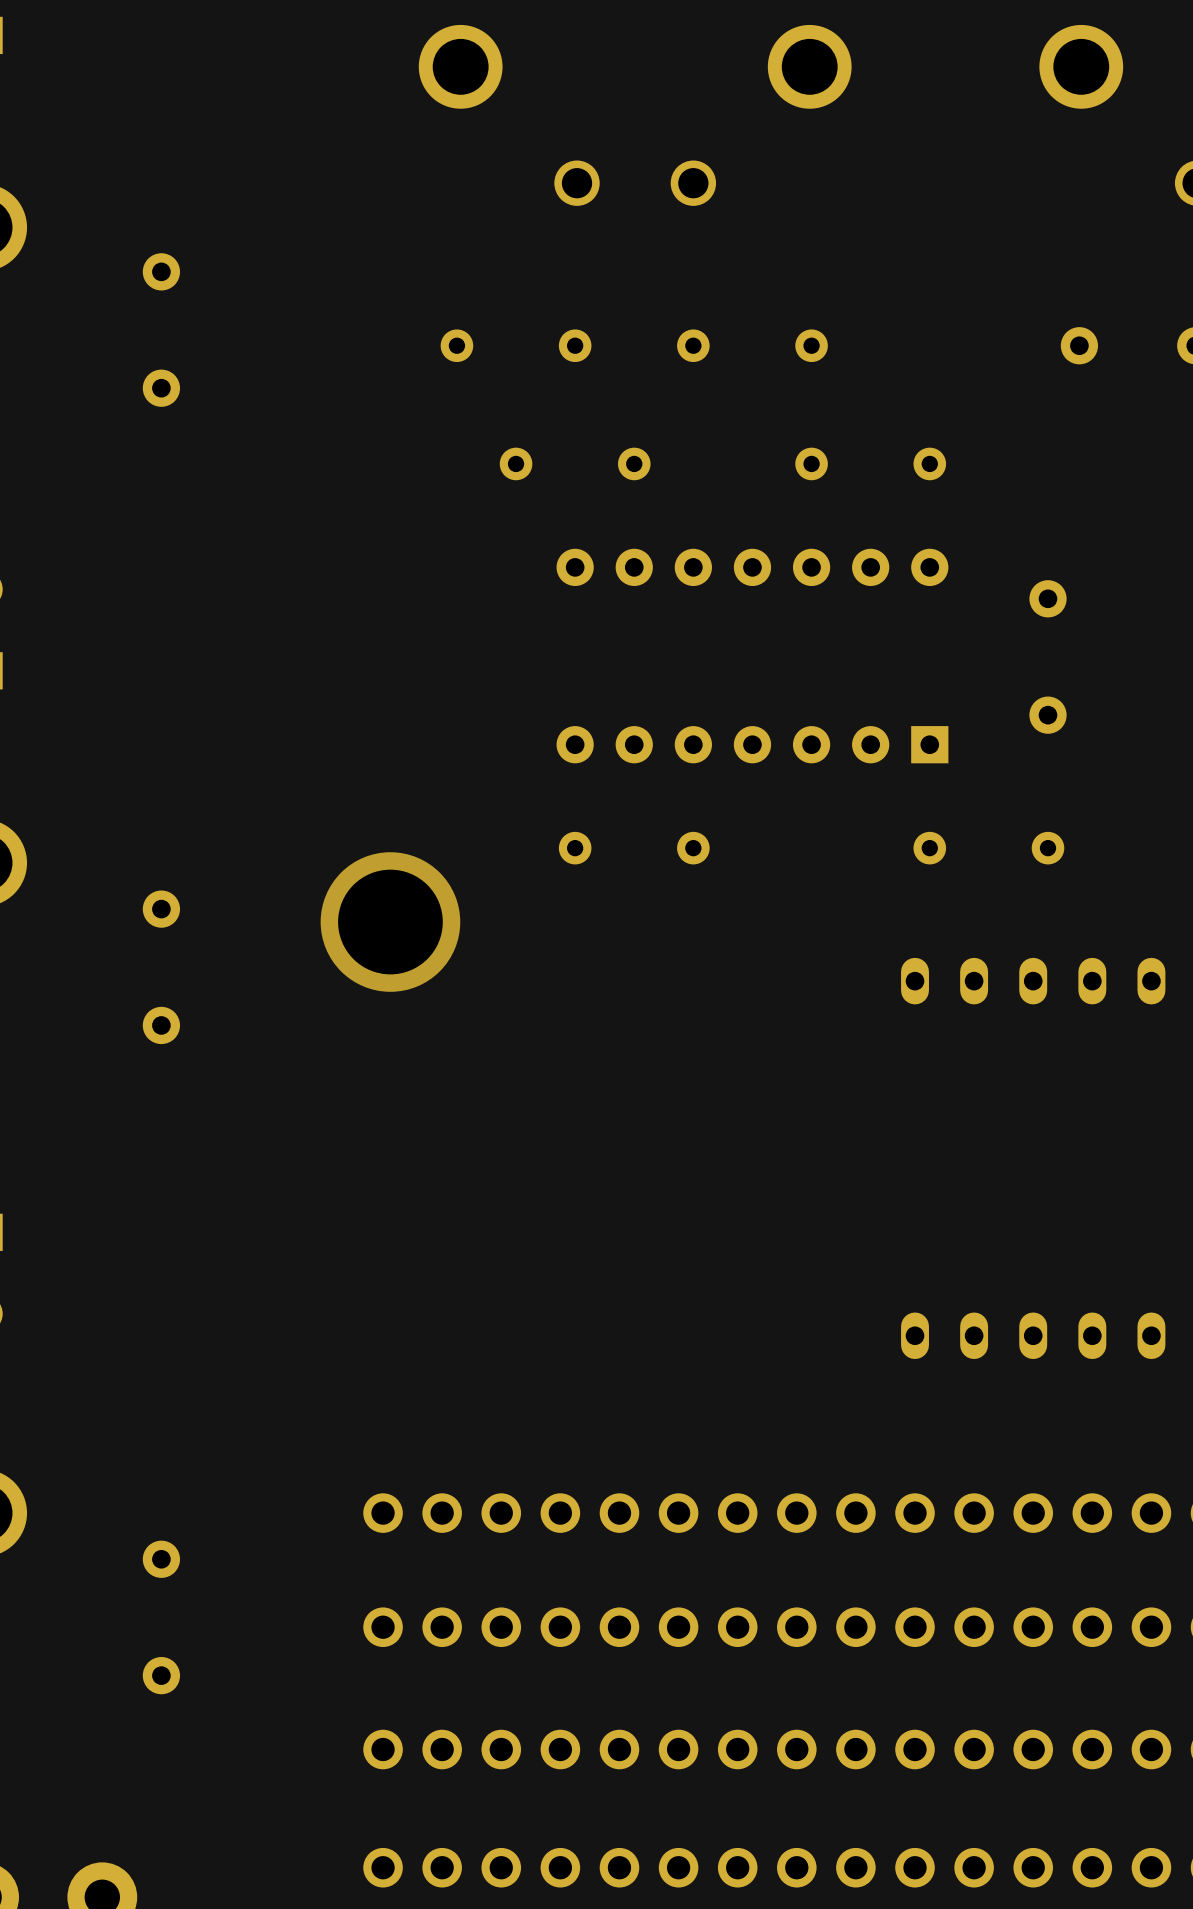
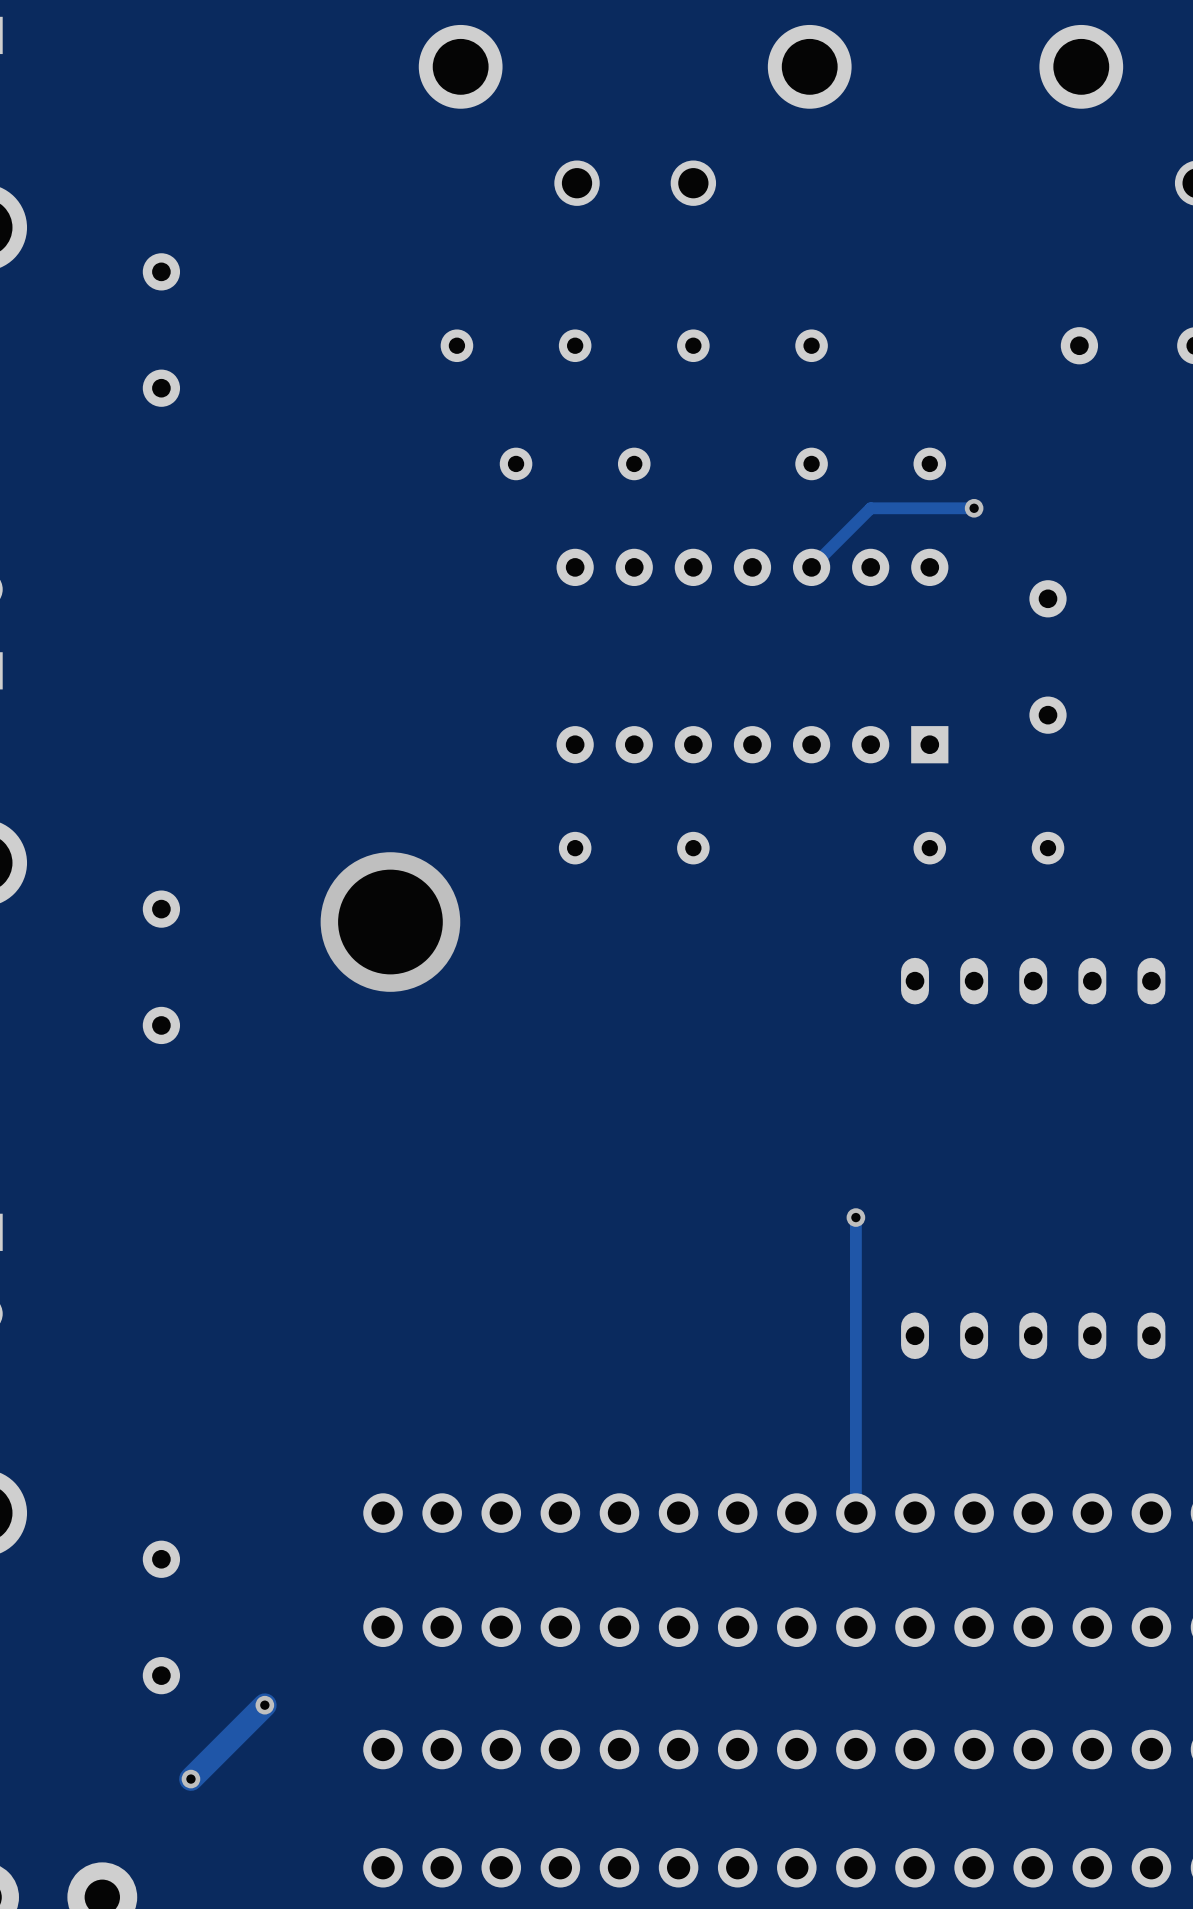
track: none -> (974, 508) (870, 508) (811, 567)
via: none -> (974, 508)
track: none -> (855, 1217) (855, 1513)
via: none -> (855, 1217)
track: none -> (264, 1705) (190, 1779)
via: none -> (264, 1705)
via: none -> (190, 1779)

